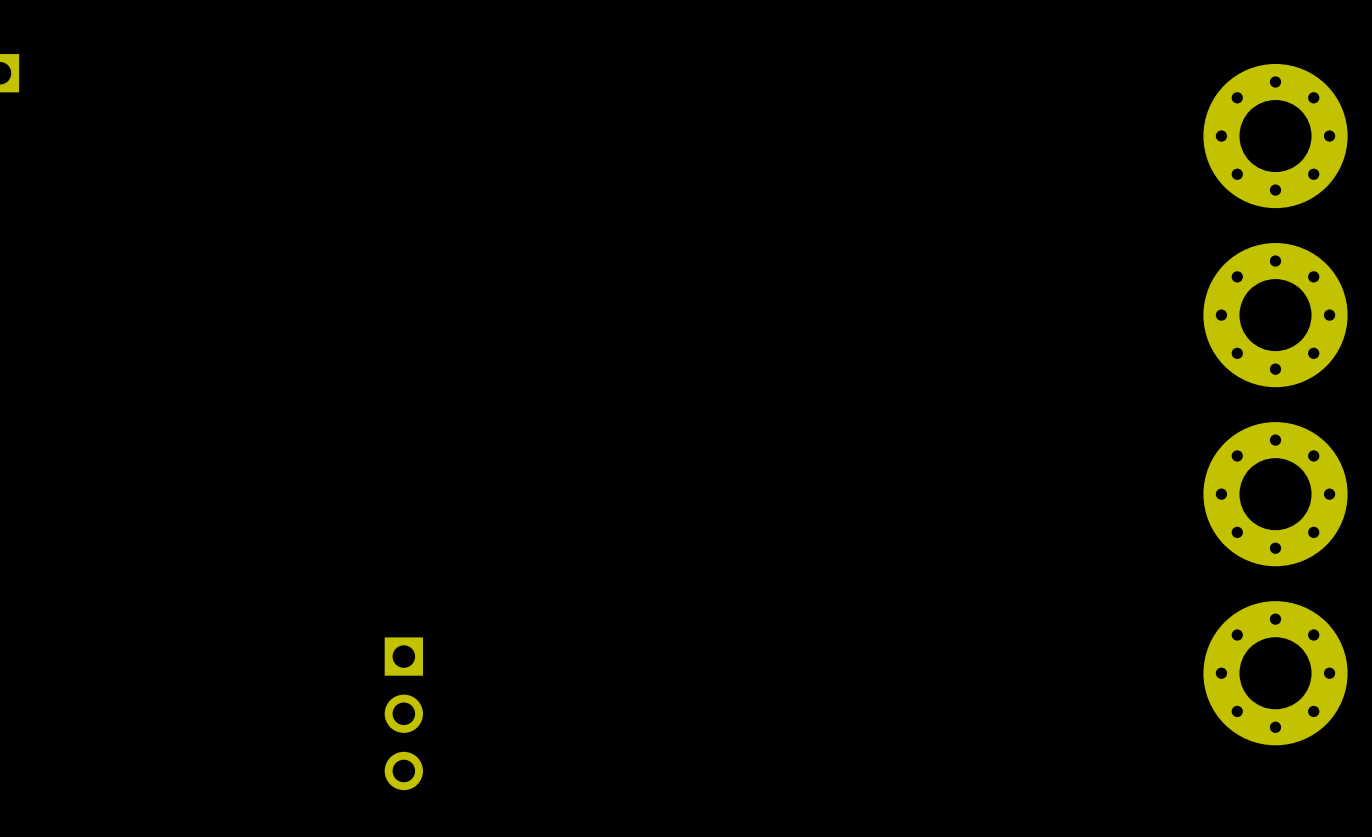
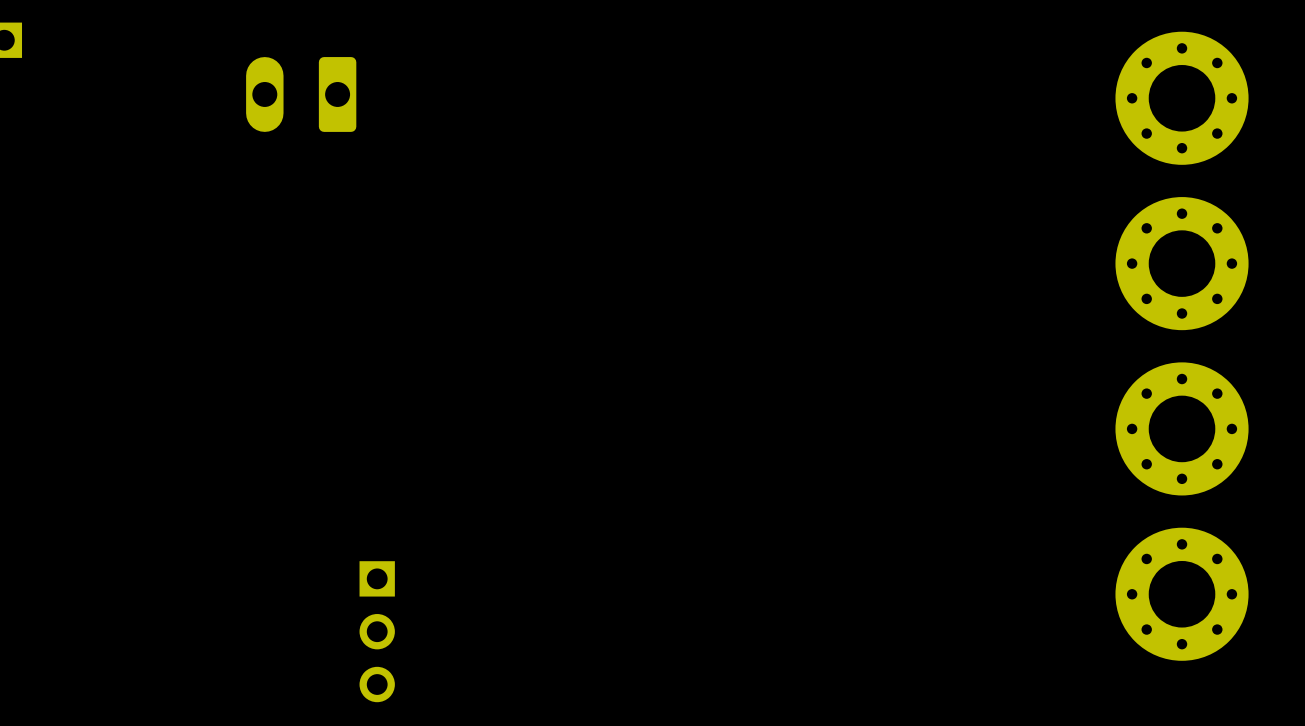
part: none -> (301, 94)

